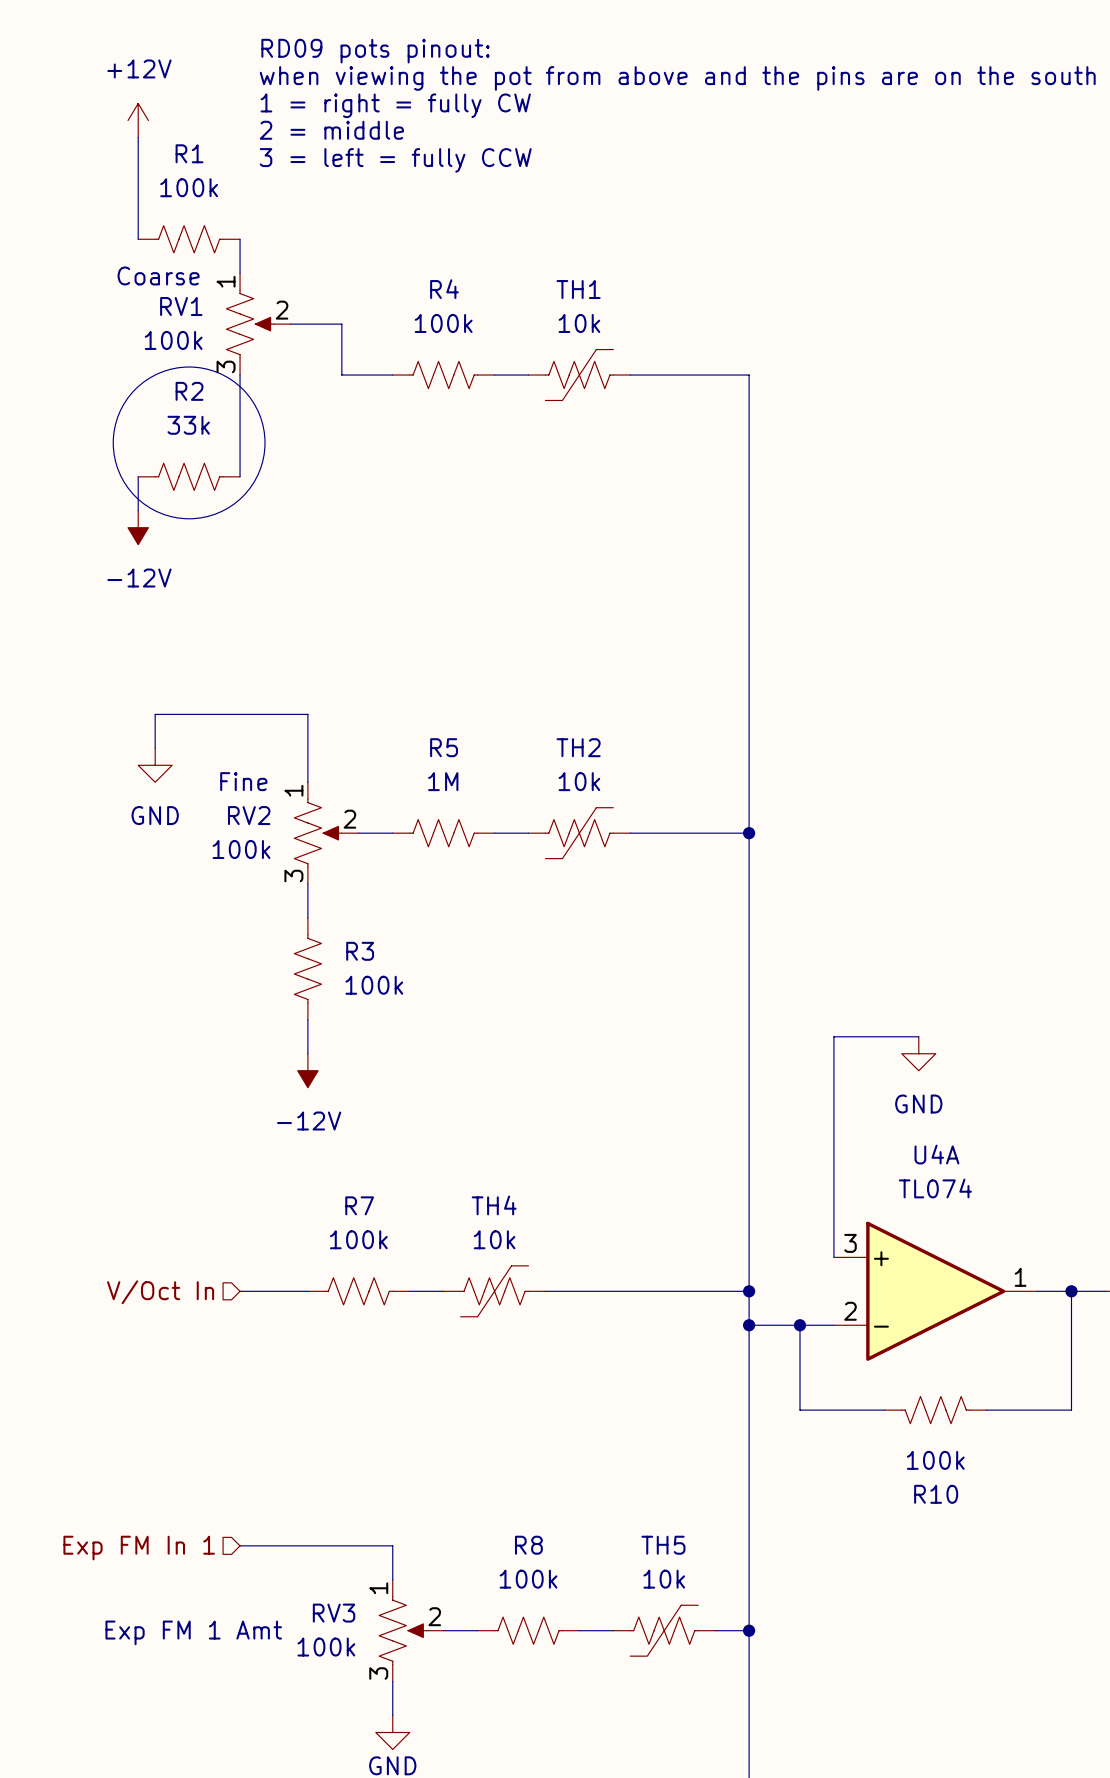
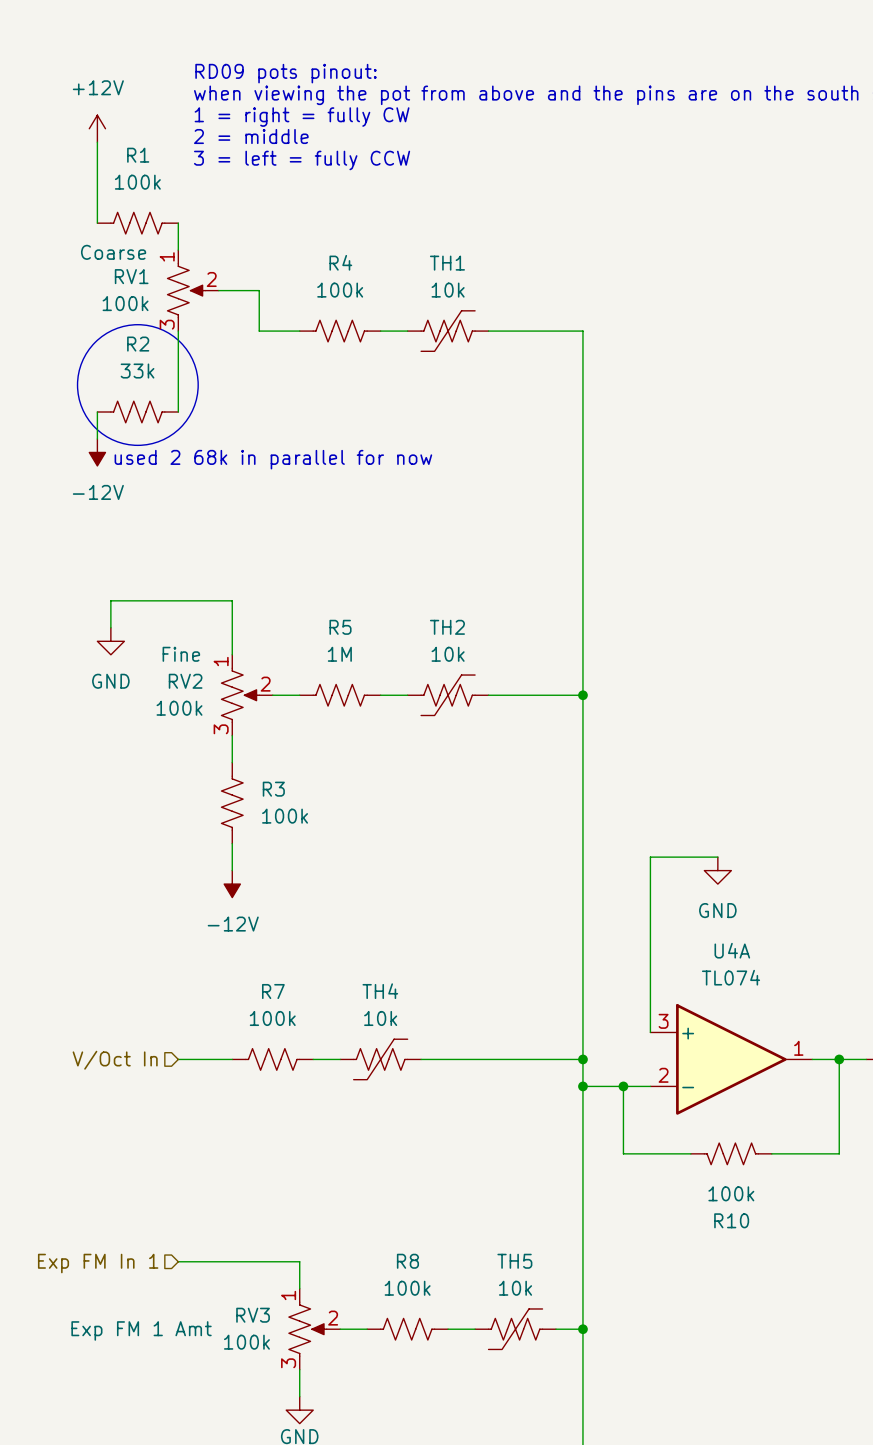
text: none -> used 2 68k in parallel for now (273, 459)

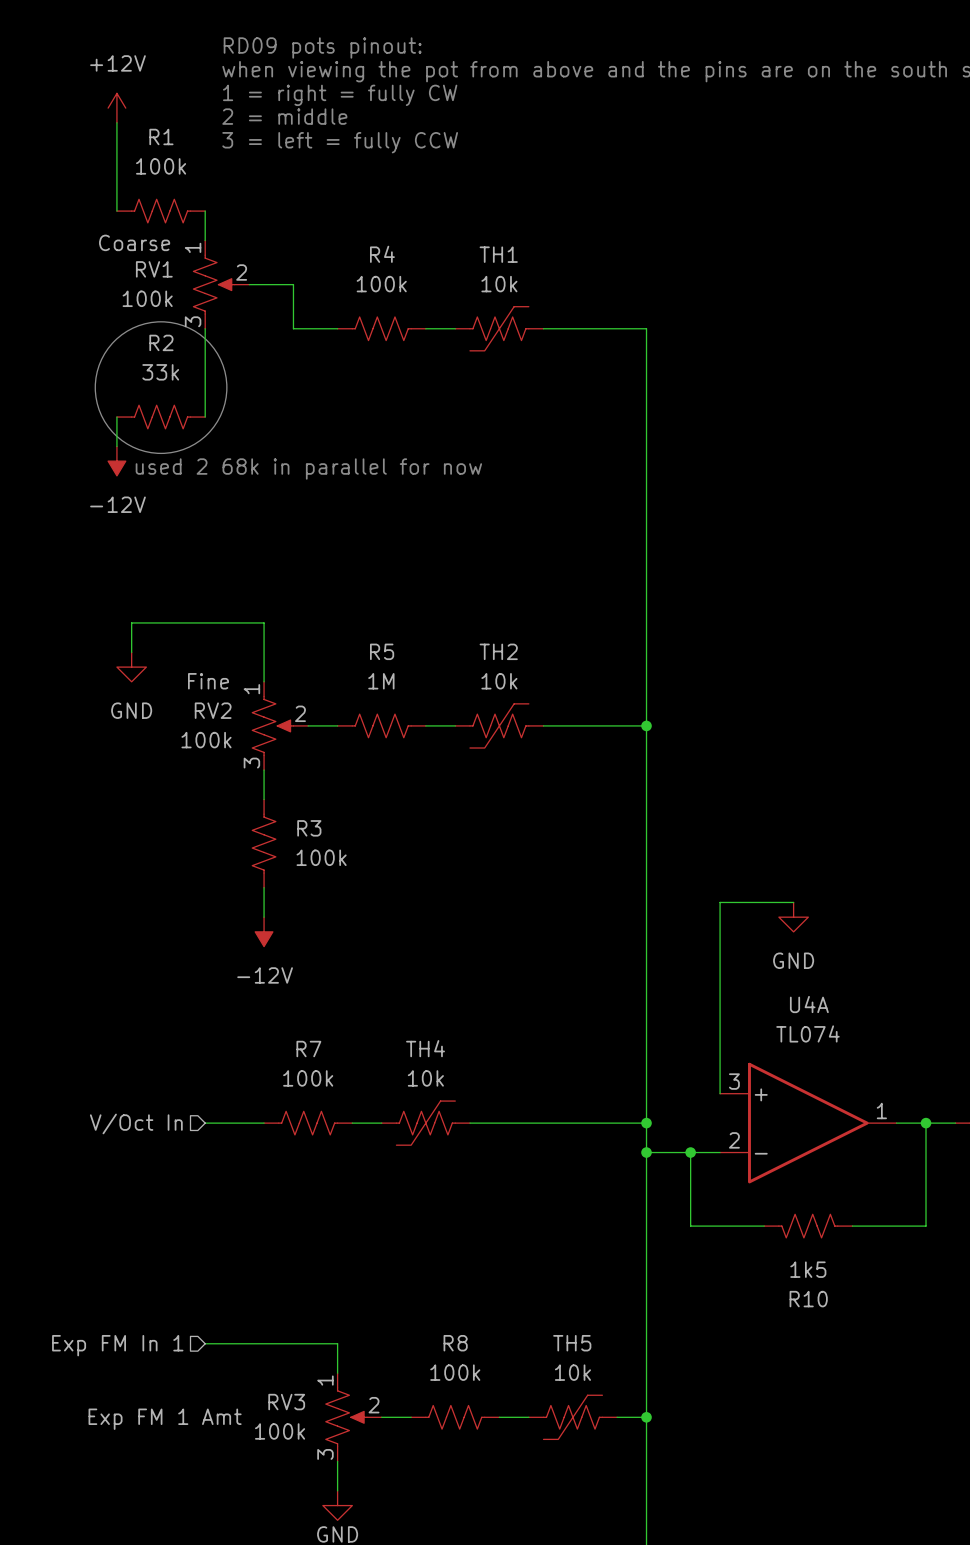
R10 value: 100k (731, 1193) -> 1k5 (808, 1269)

